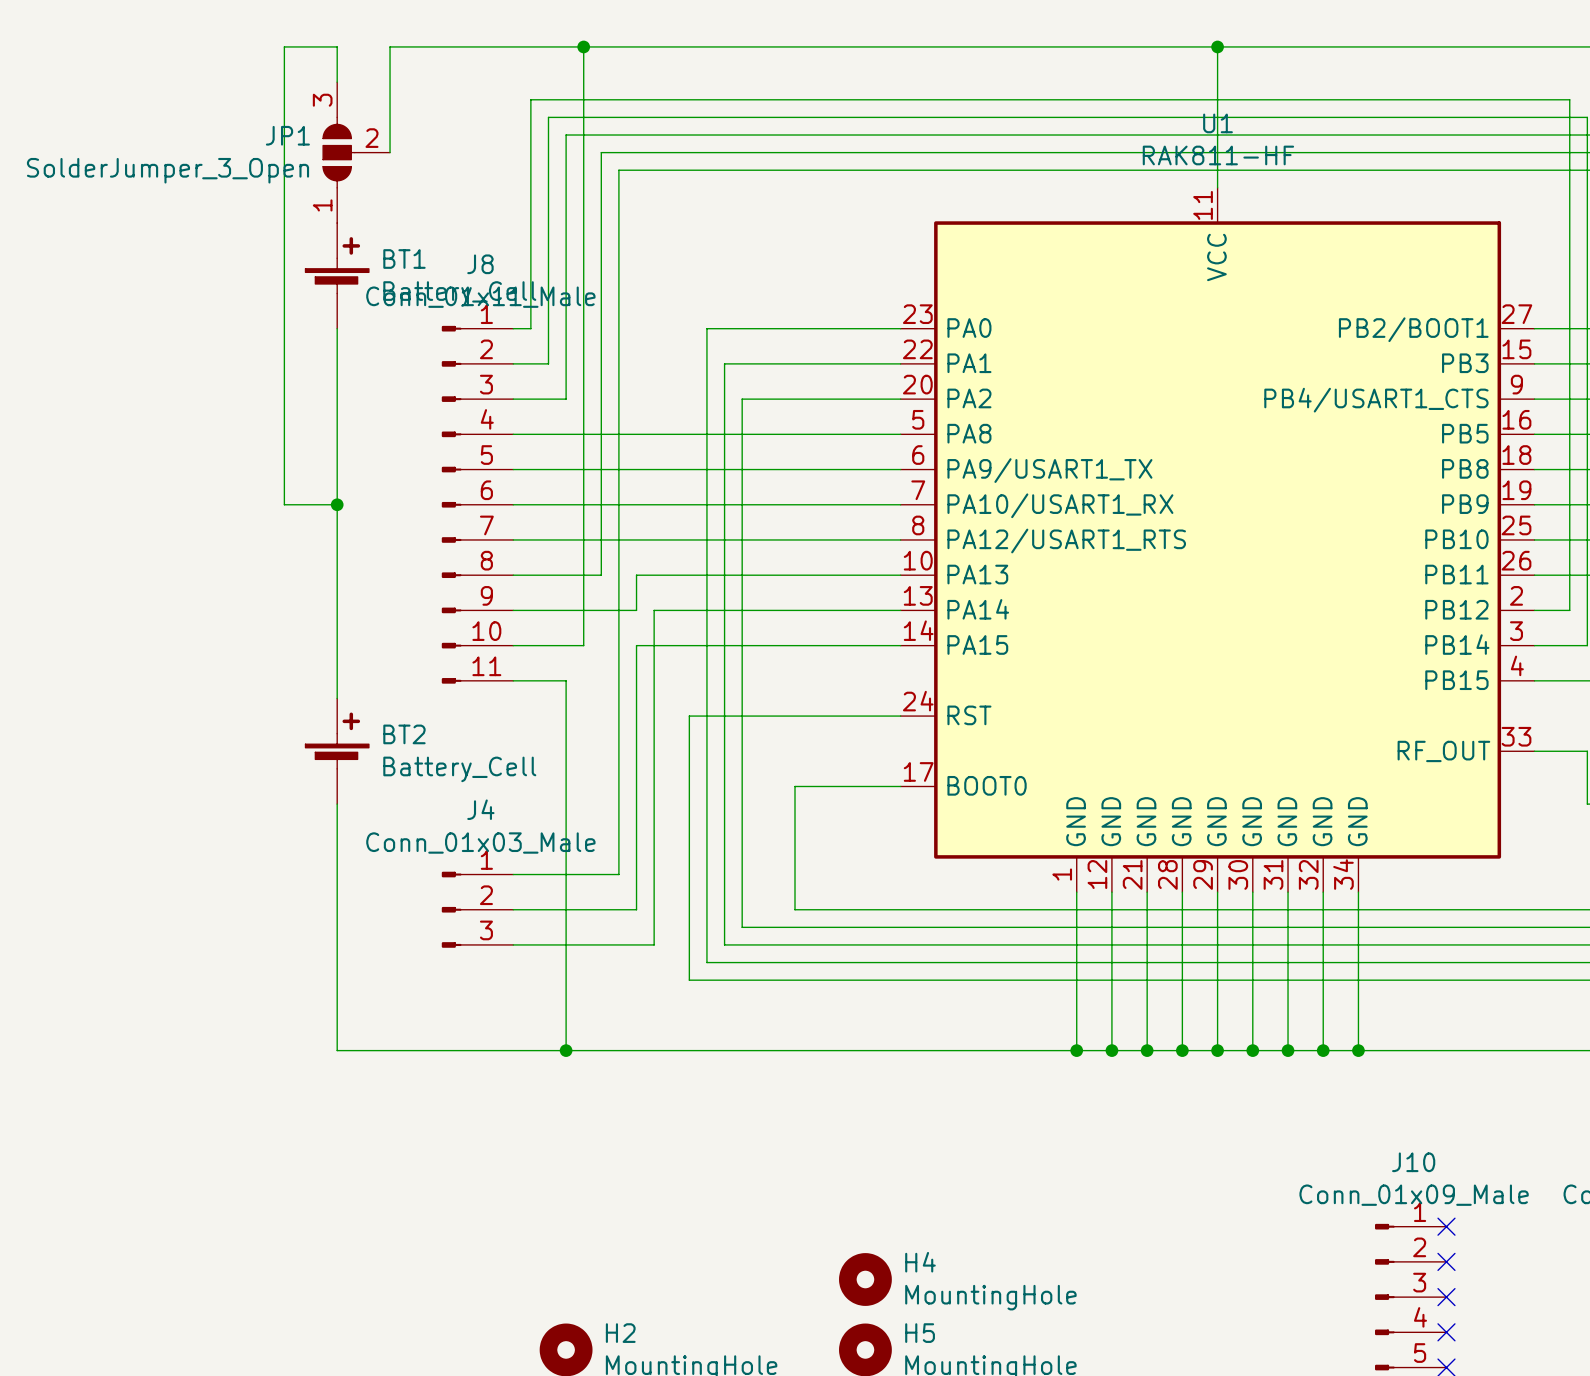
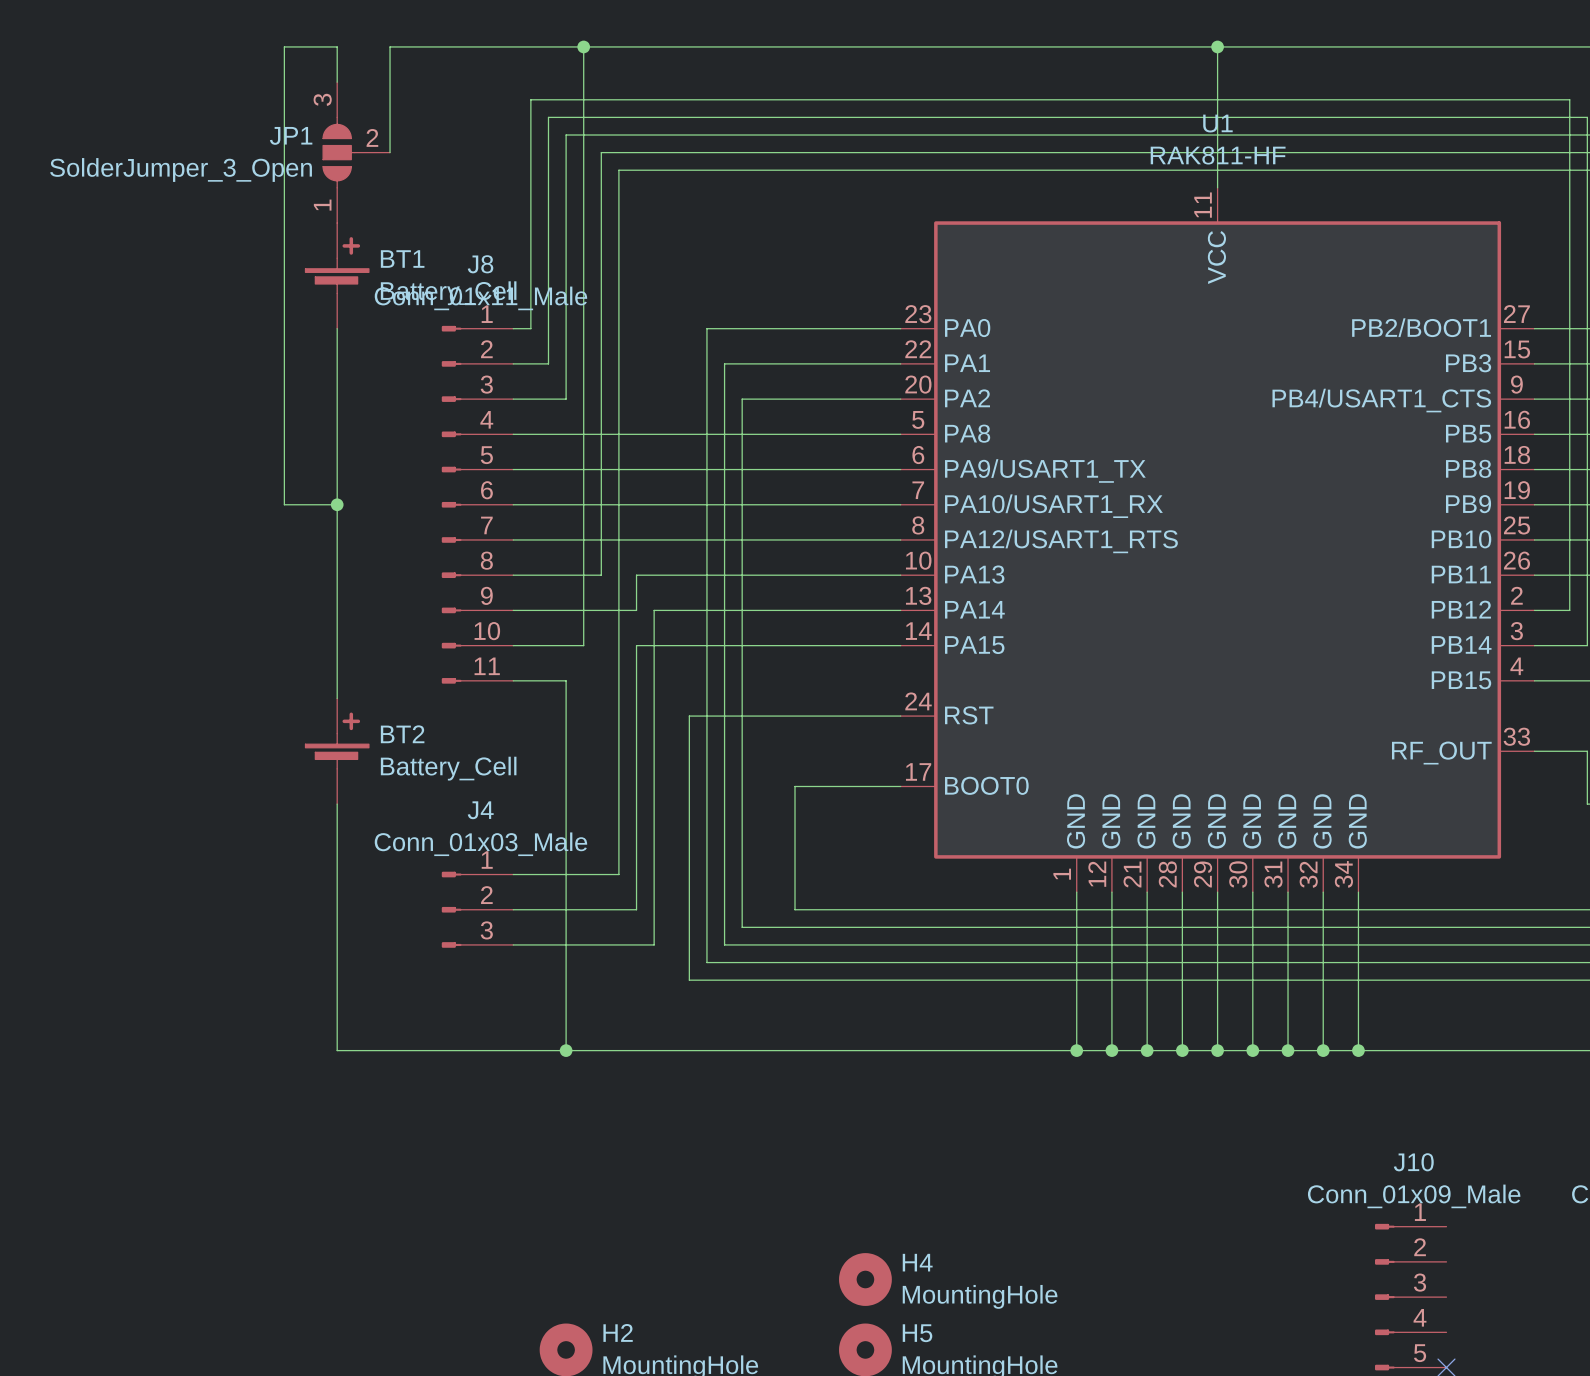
no-connect mark: (1446, 1226) -> none
no-connect mark: (1446, 1261) -> none
no-connect mark: (1446, 1297) -> none
no-connect mark: (1446, 1332) -> none

